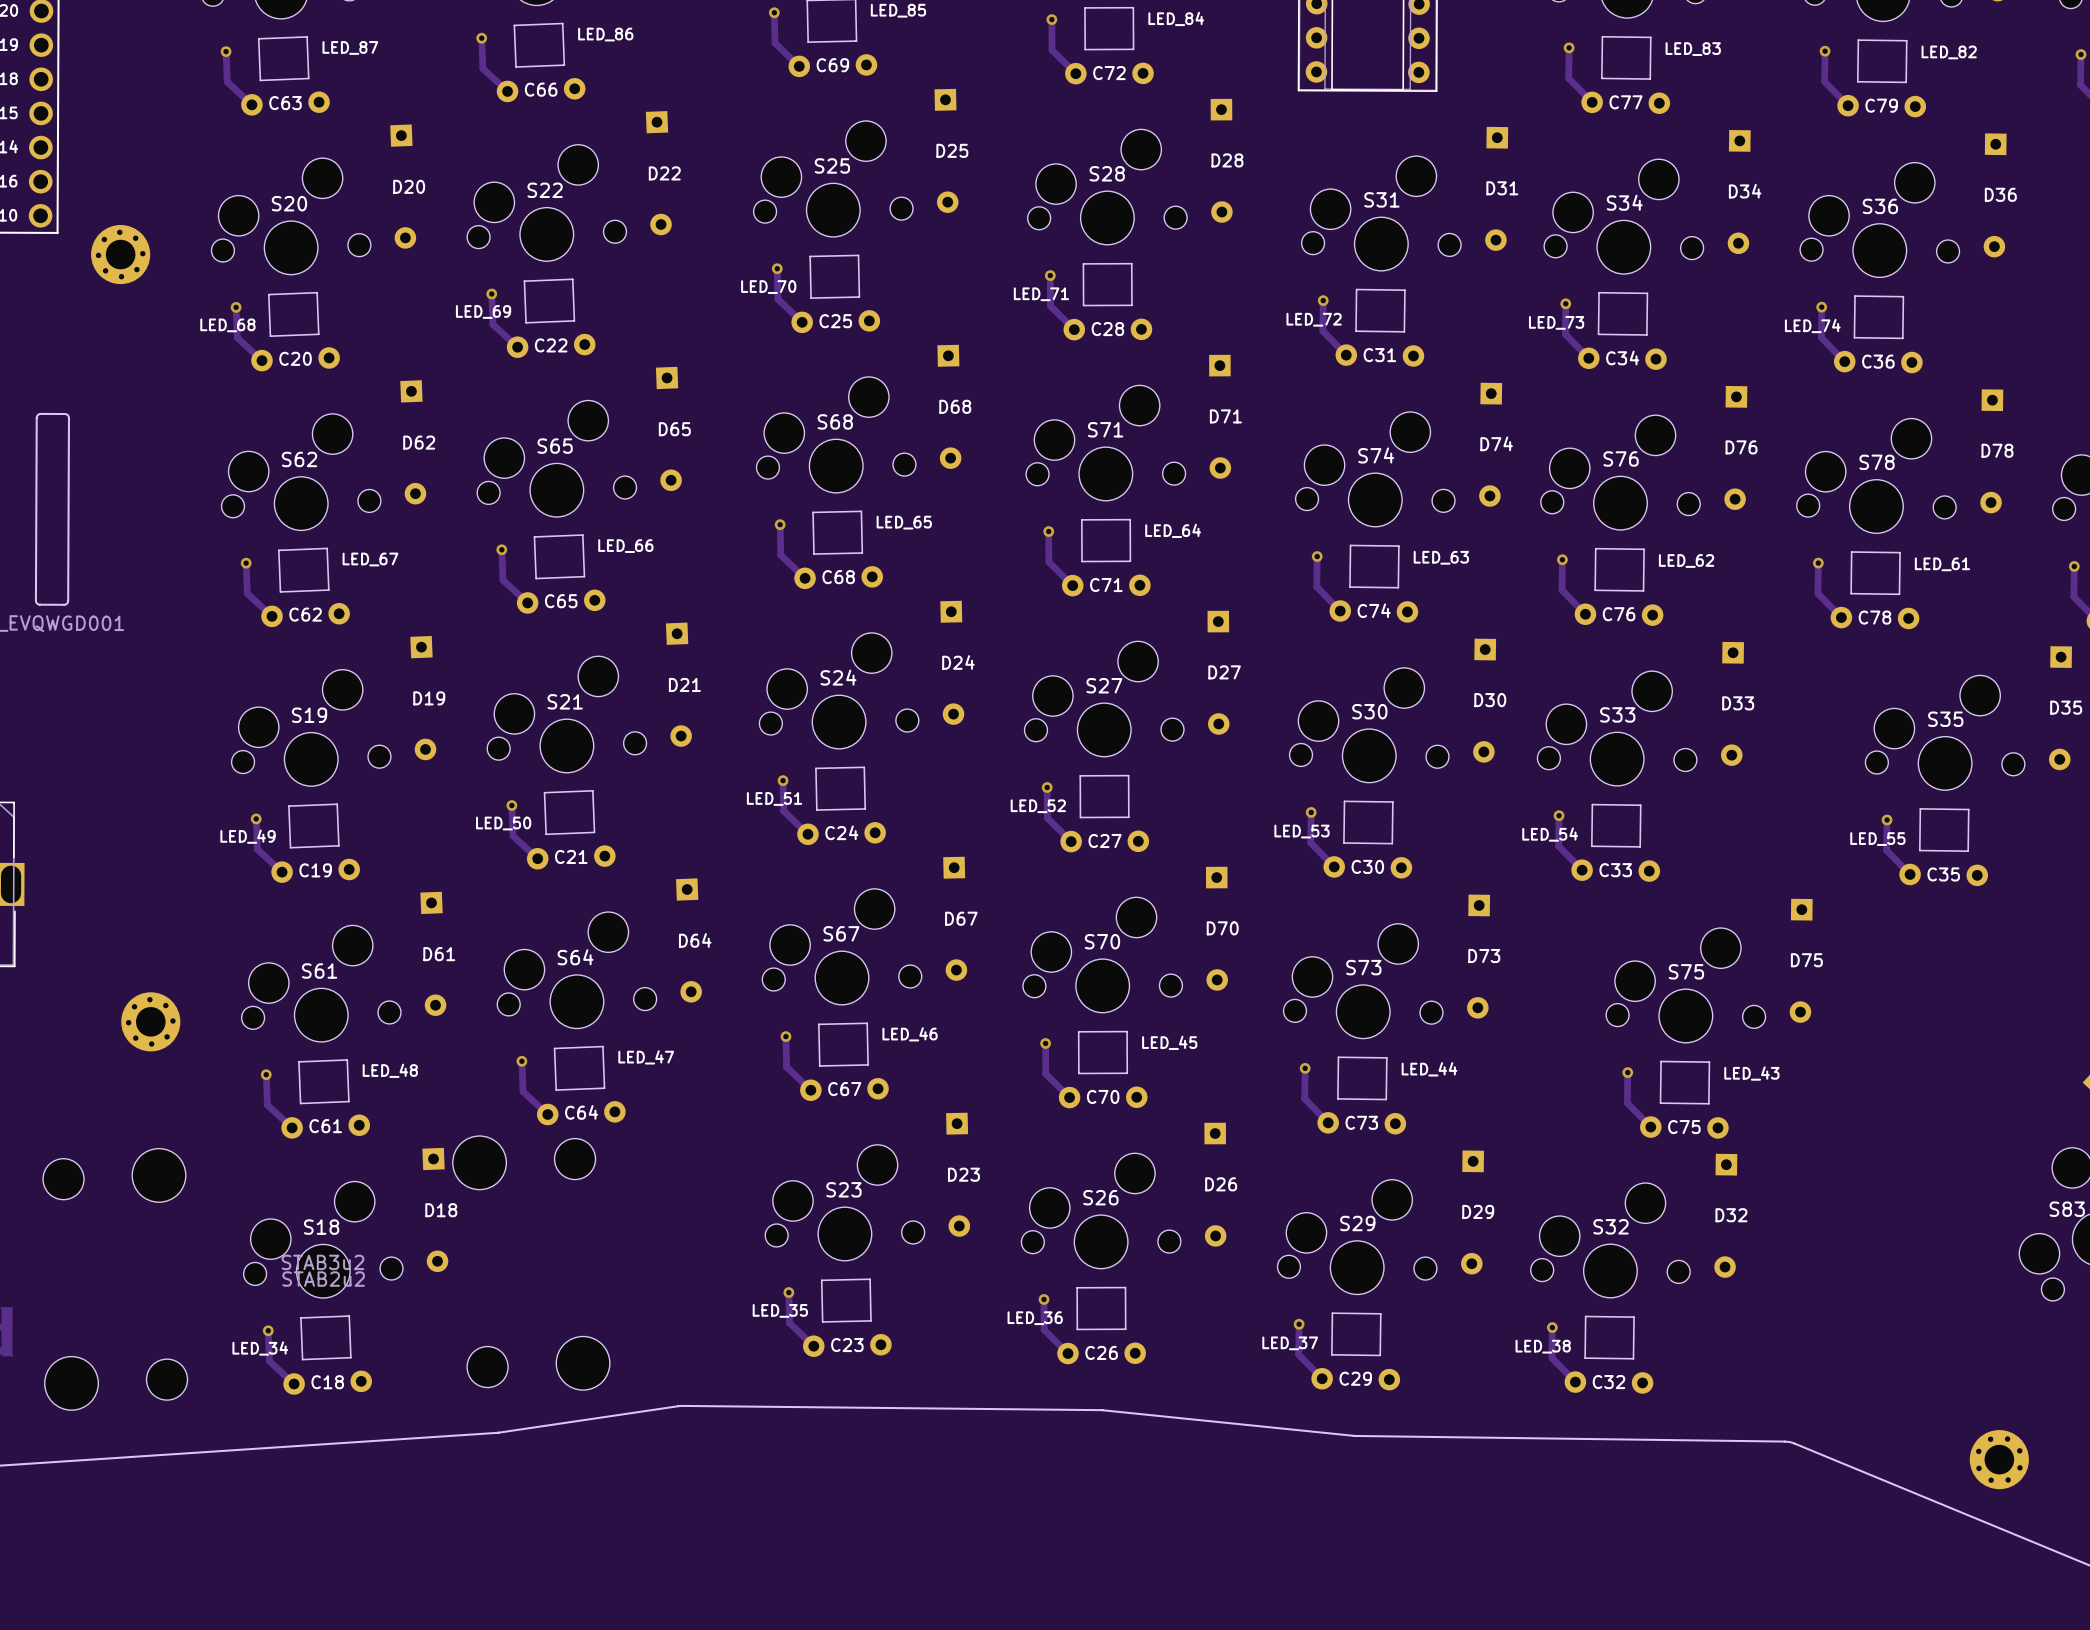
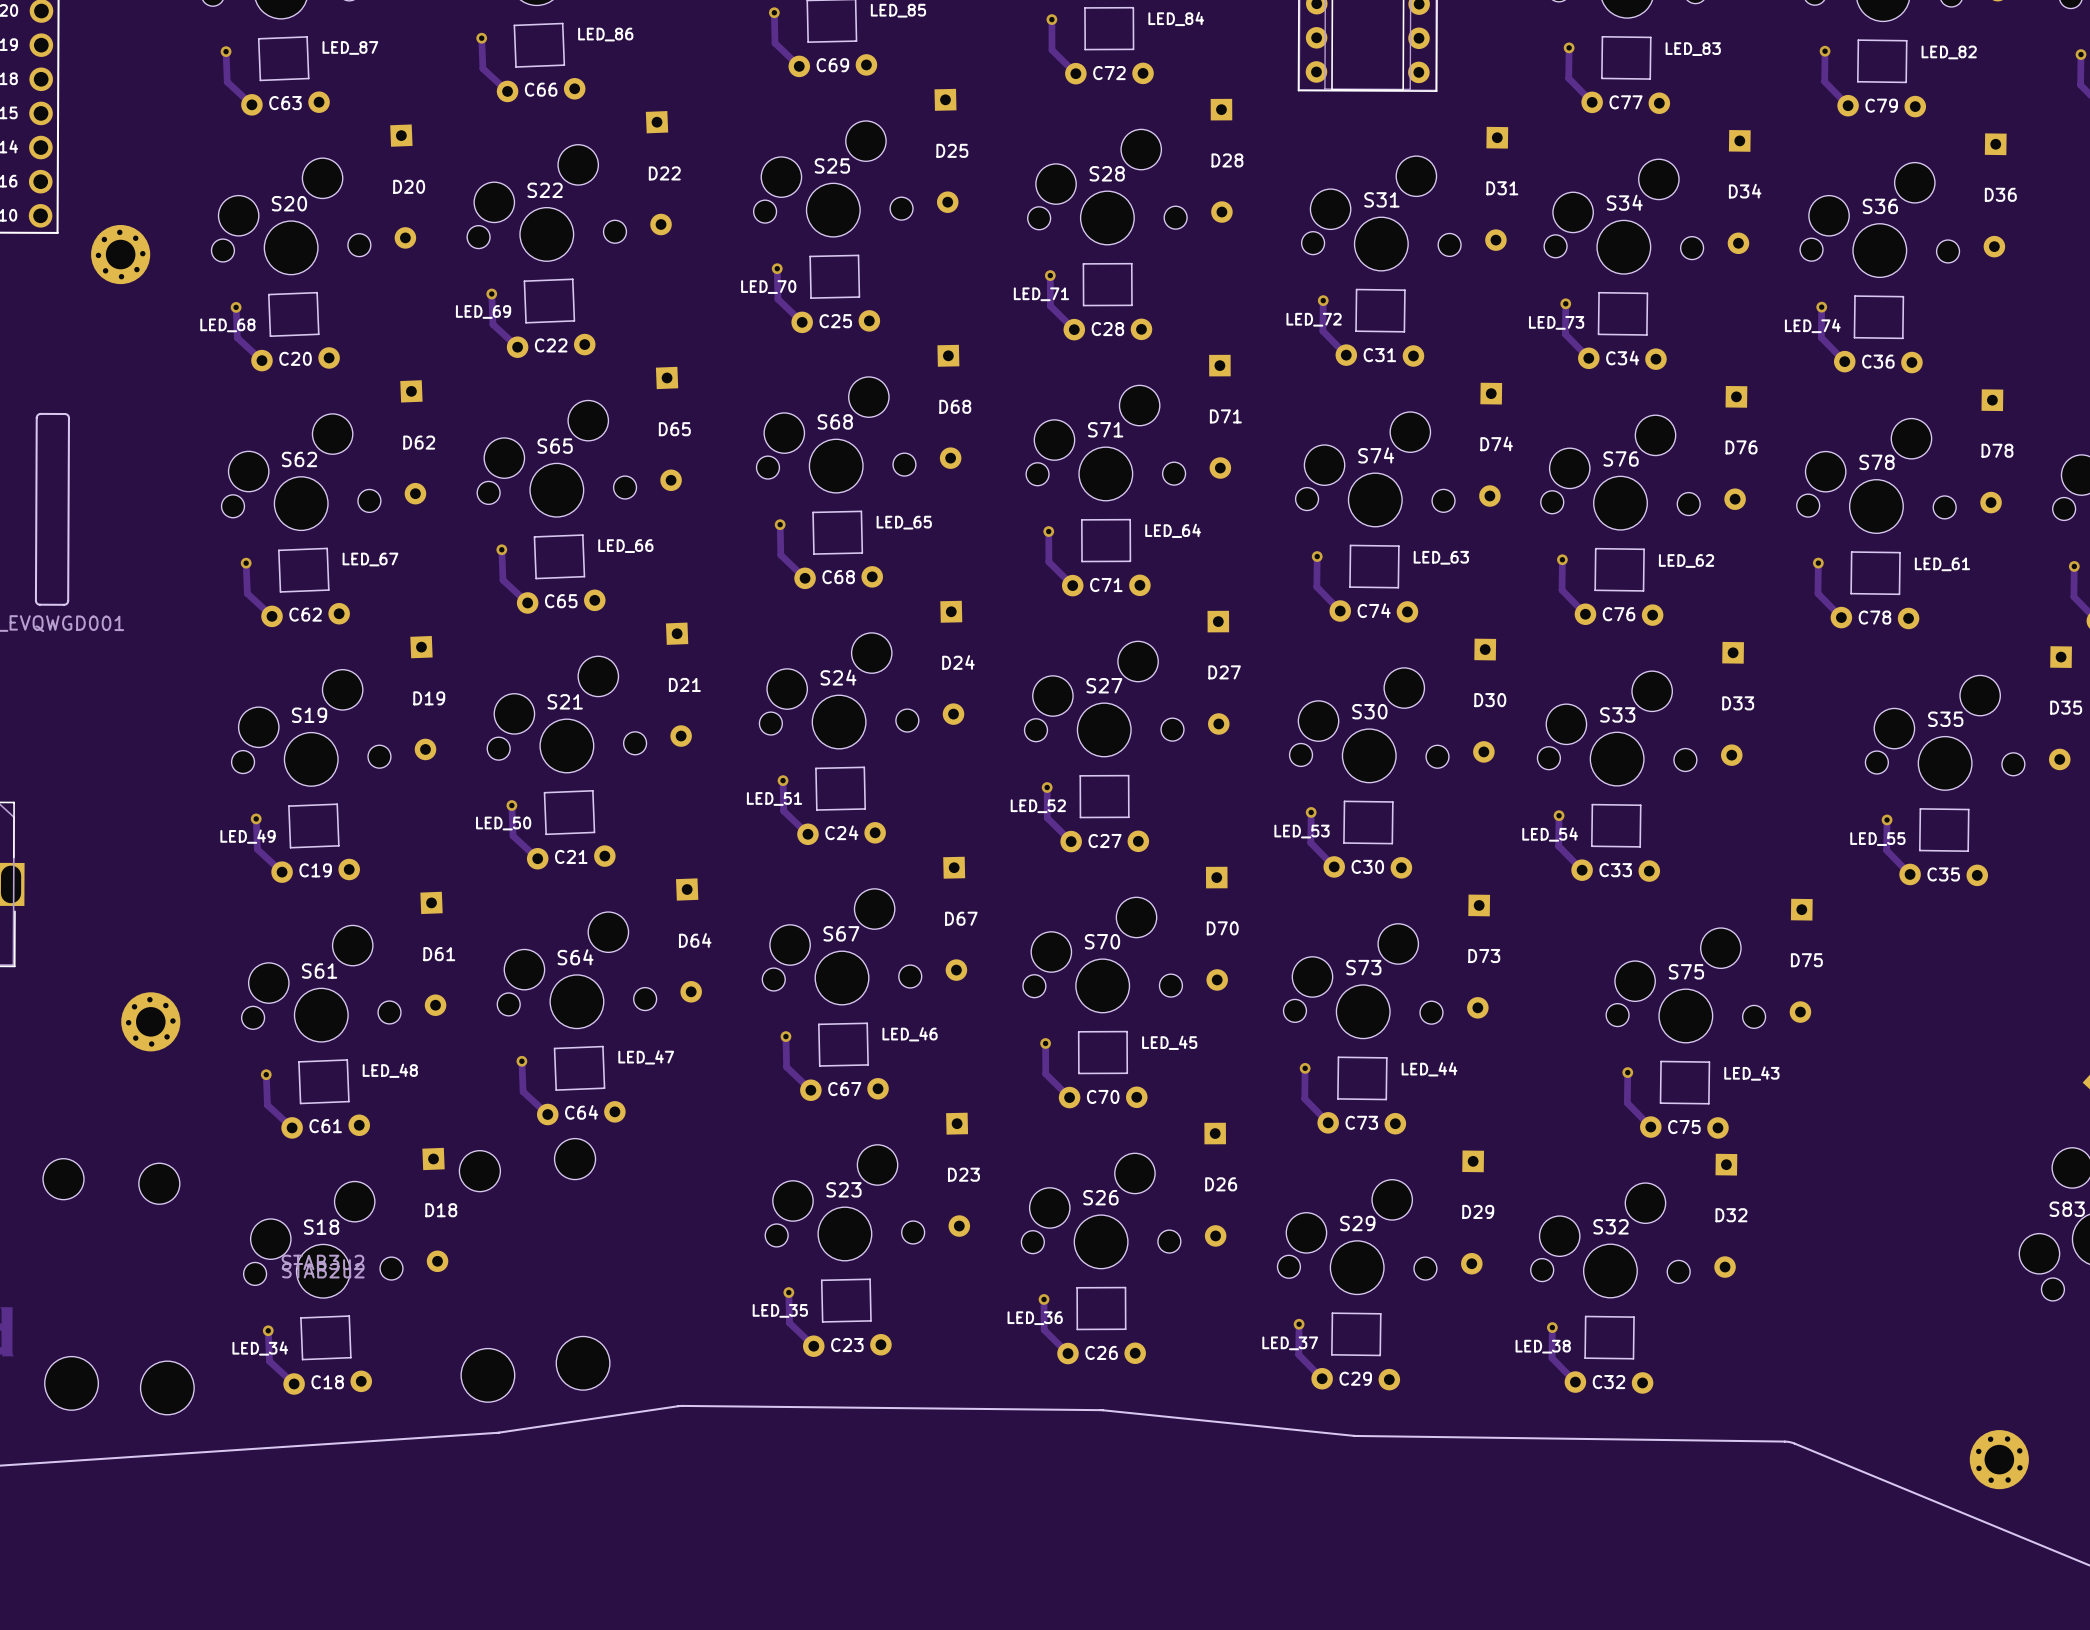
STAB2u2 rotation: 0° (320, 1268) -> 180° (326, 1282)

